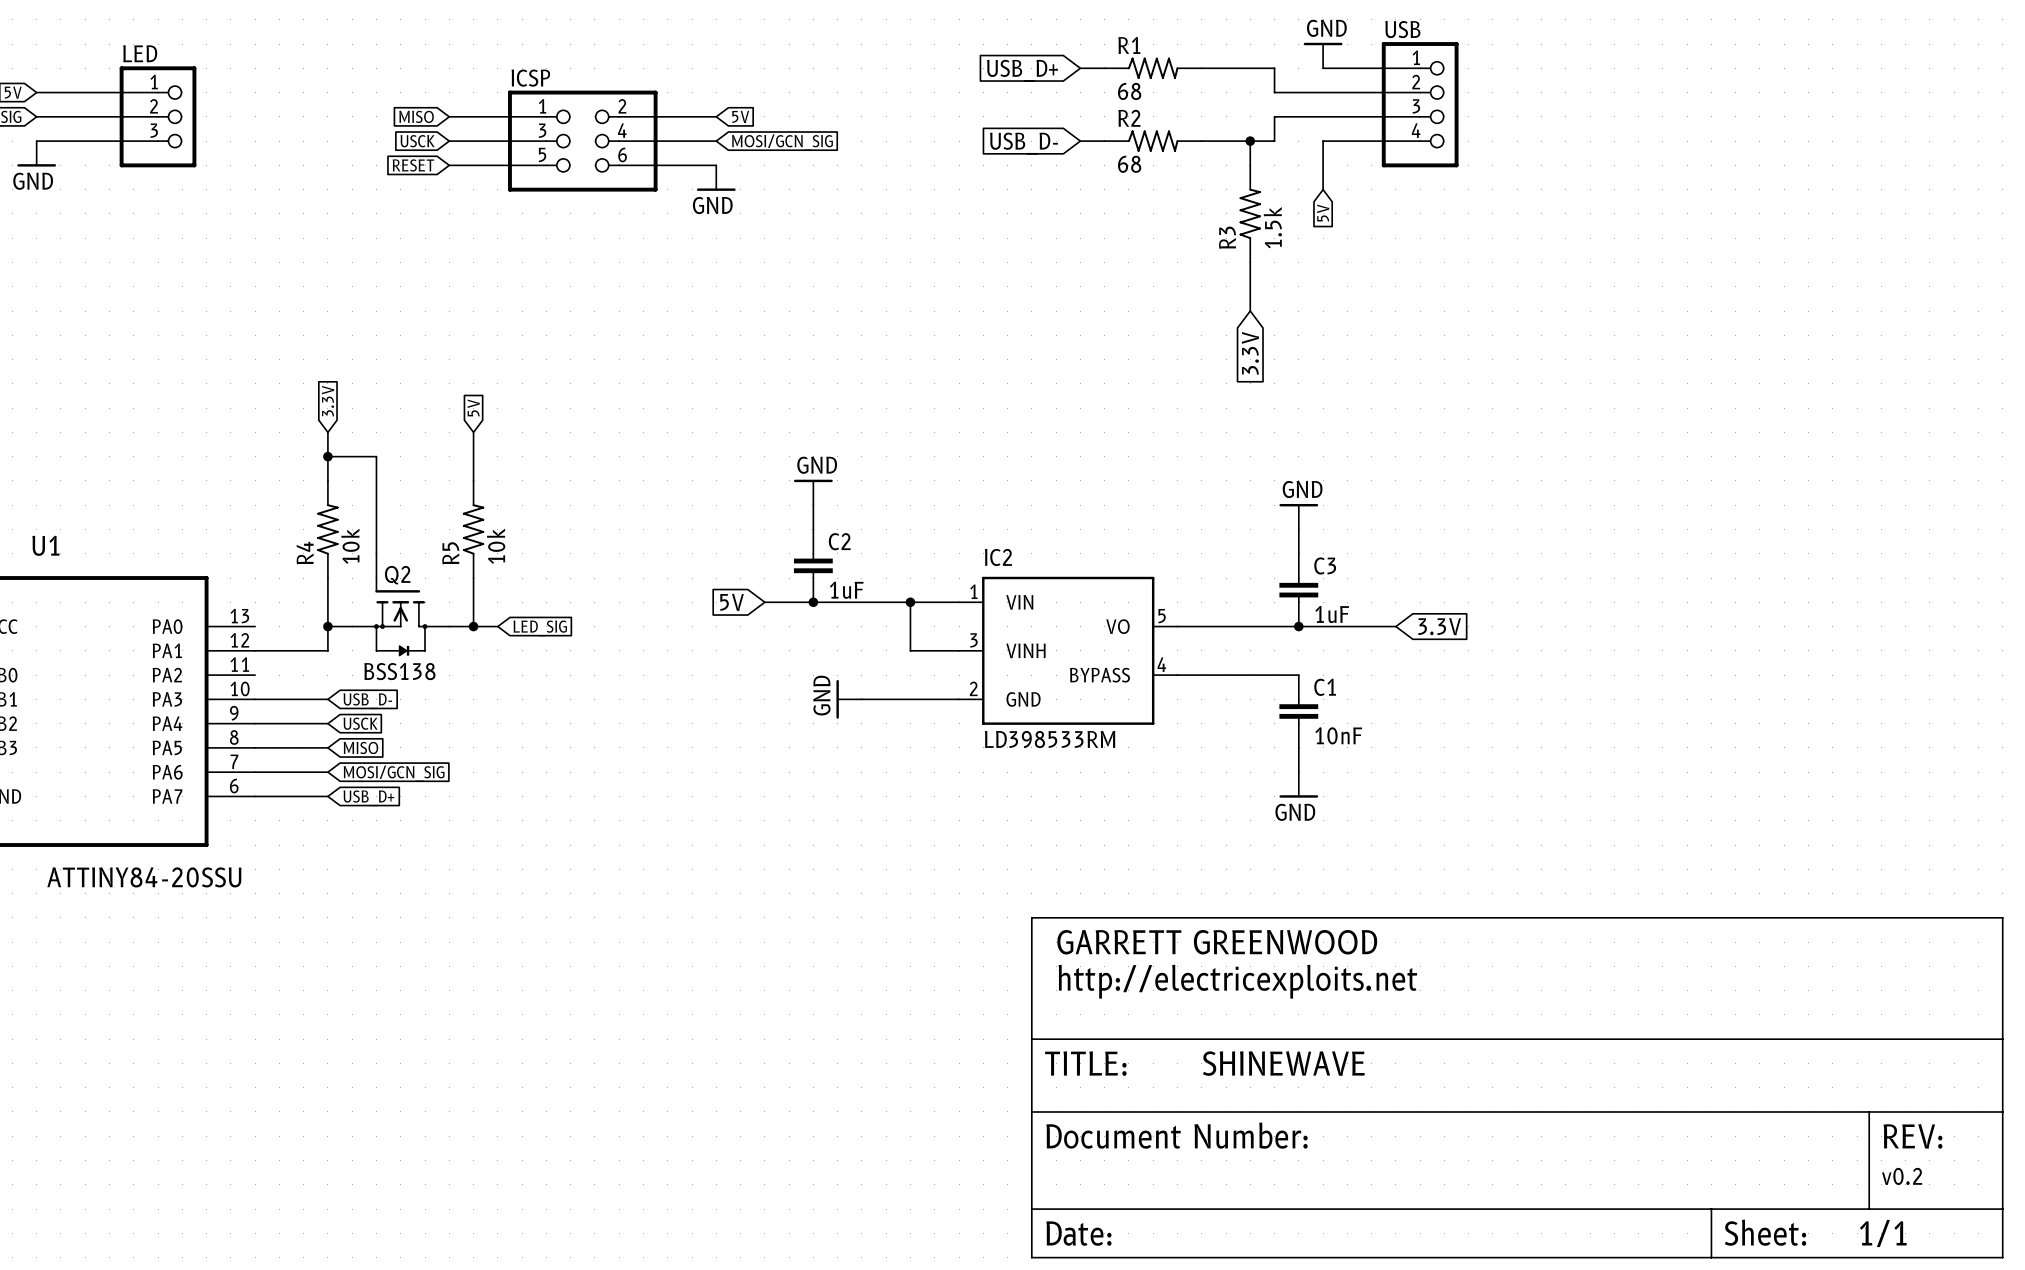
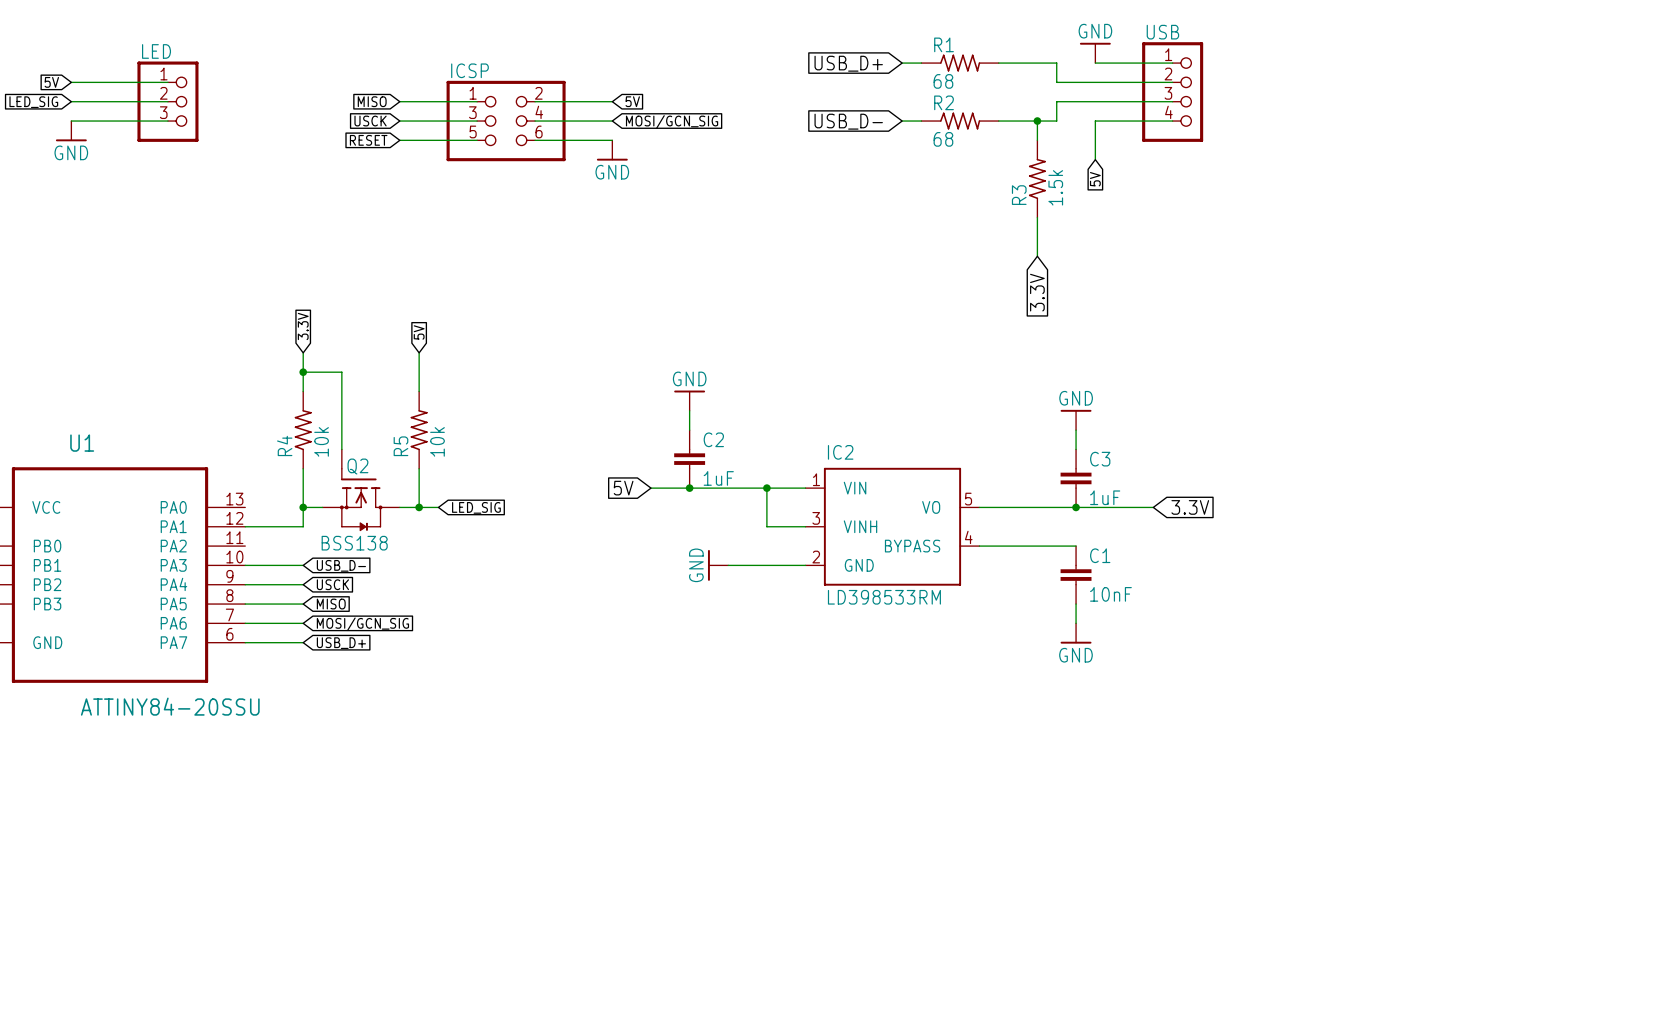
part: (1517, 1087) -> none

